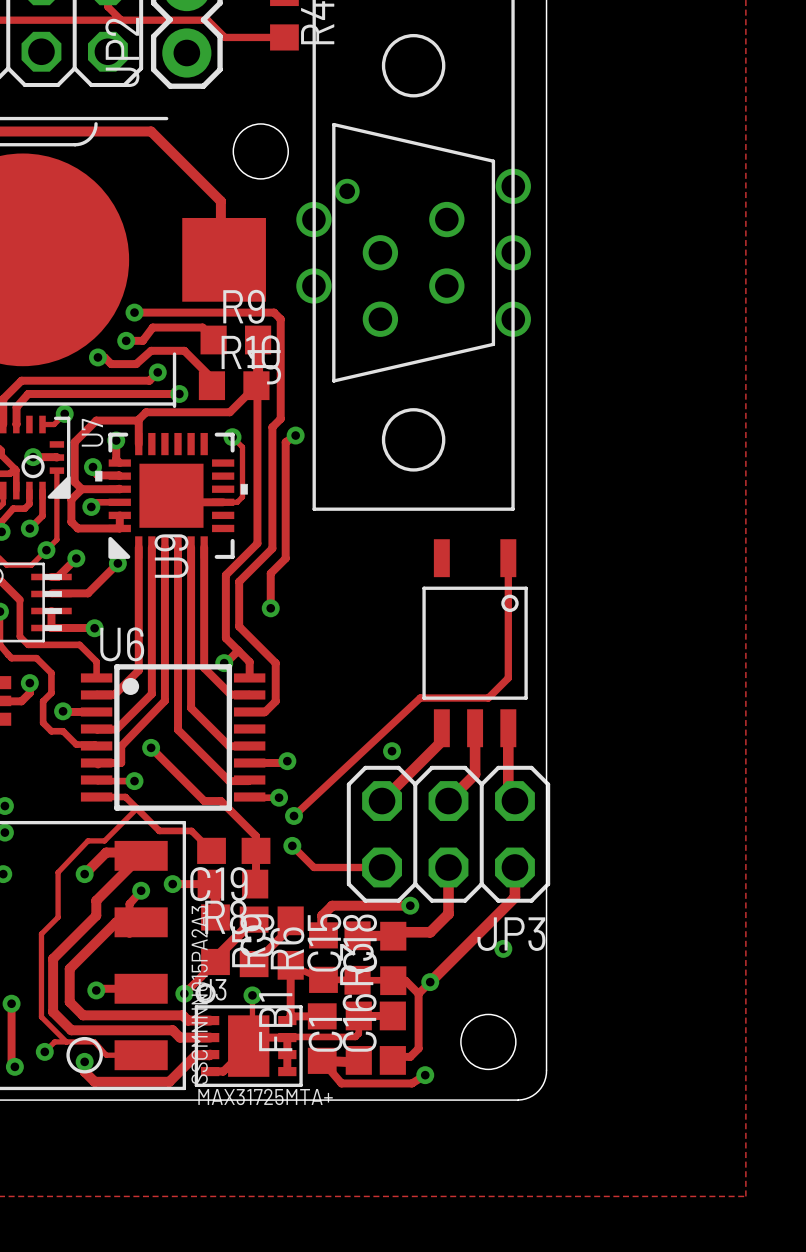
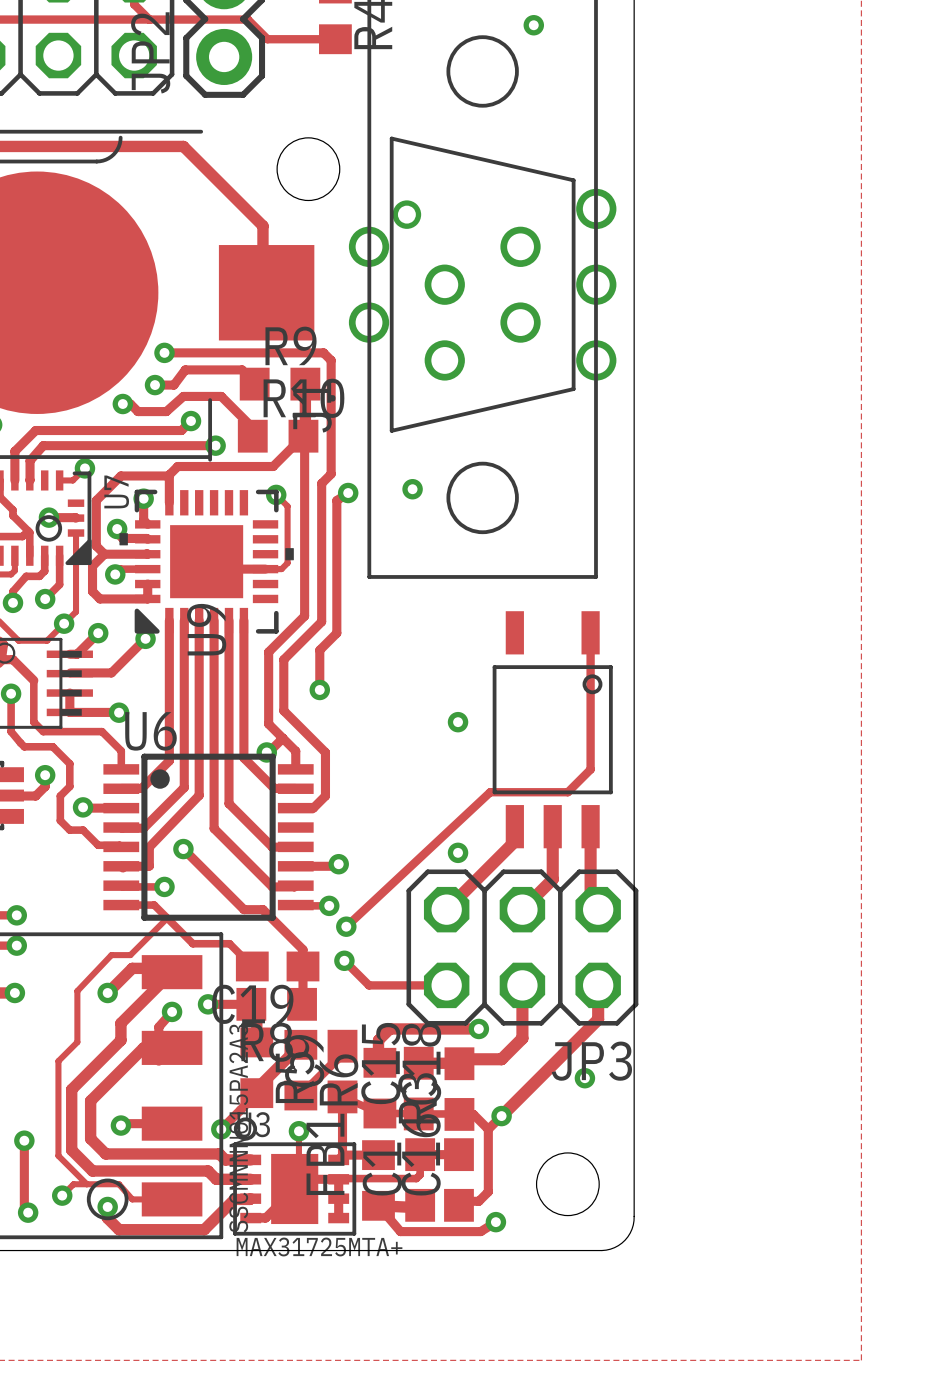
via: none -> (533, 25)
via: none -> (412, 489)
via: none -> (458, 722)

